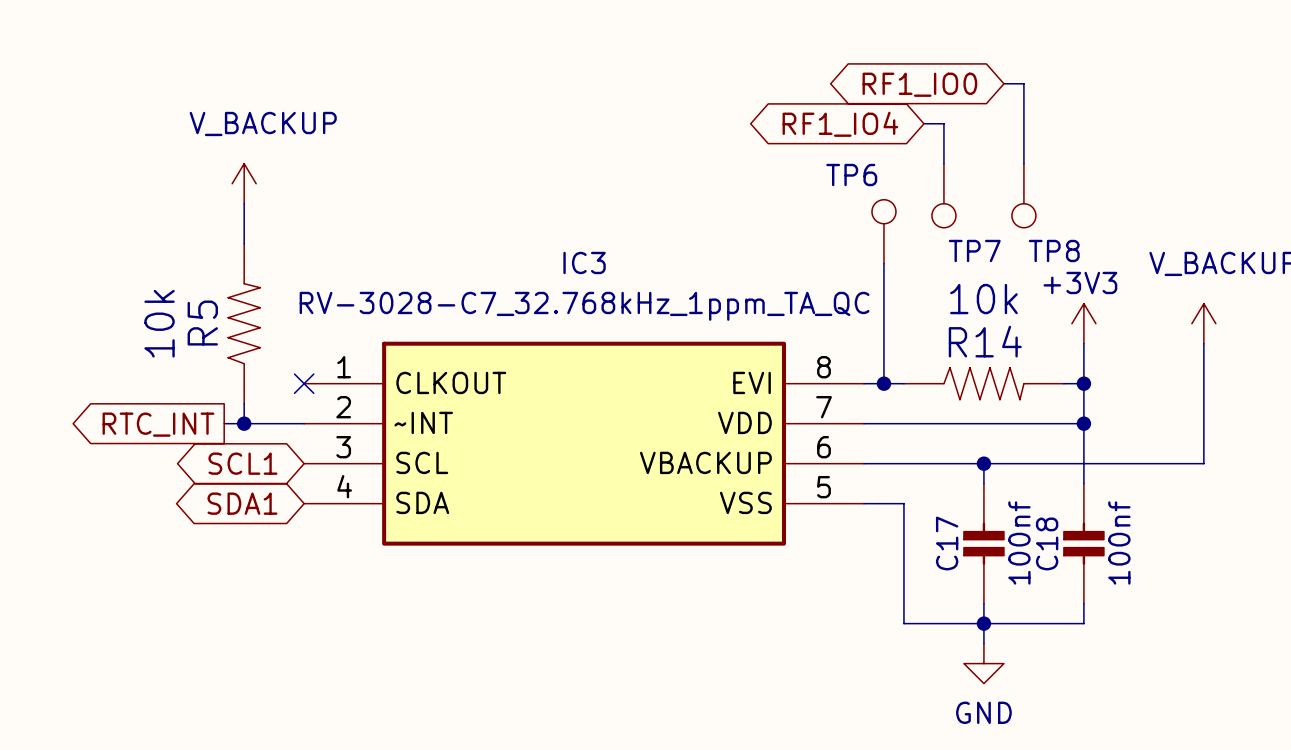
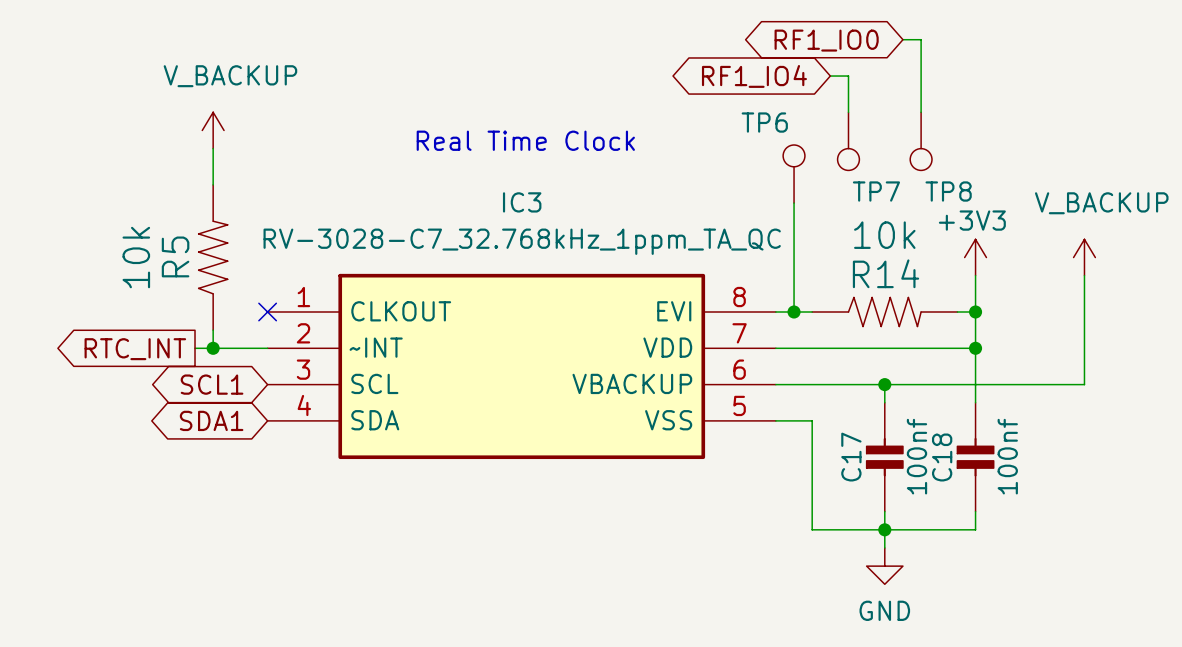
text: none -> Real Time Clock (525, 140)

